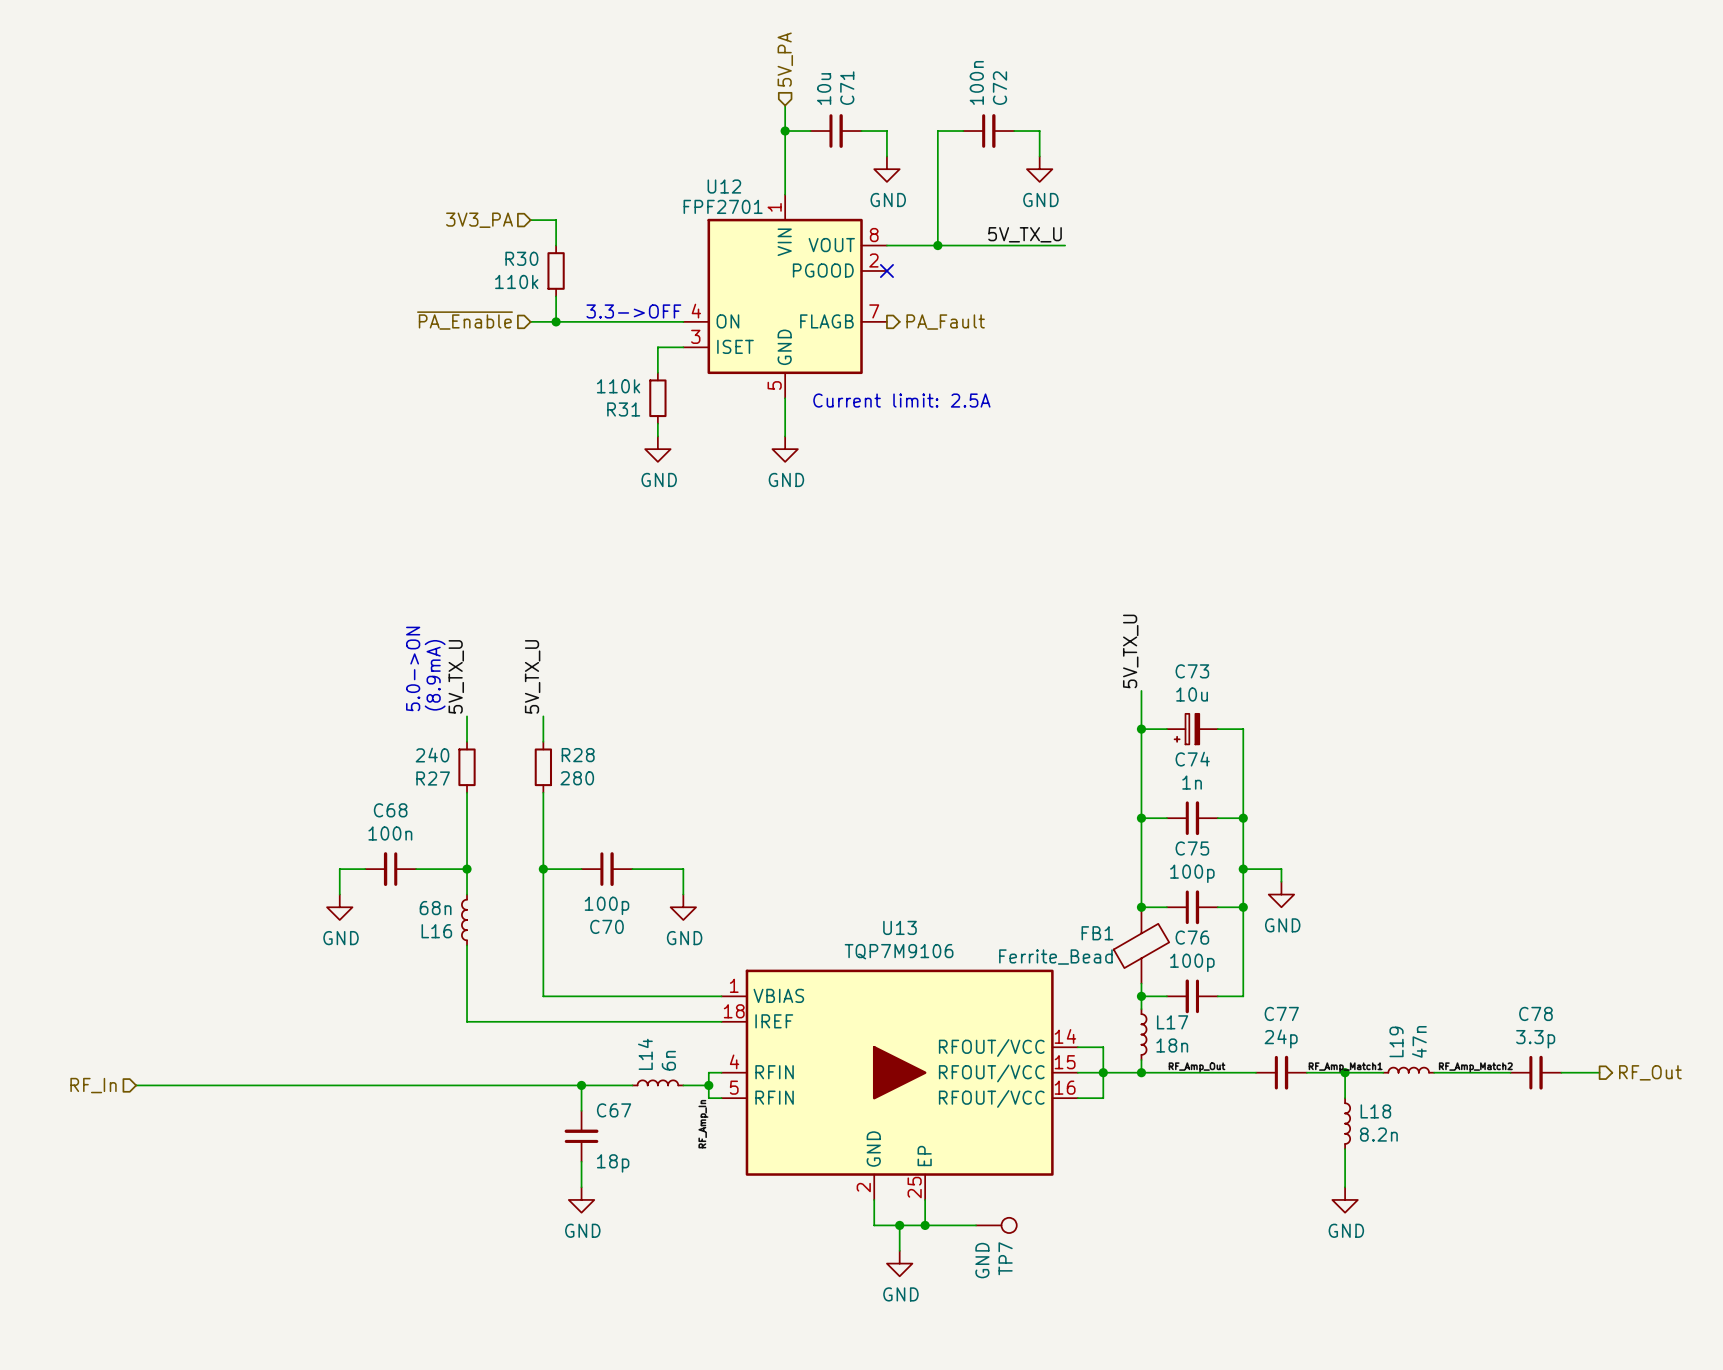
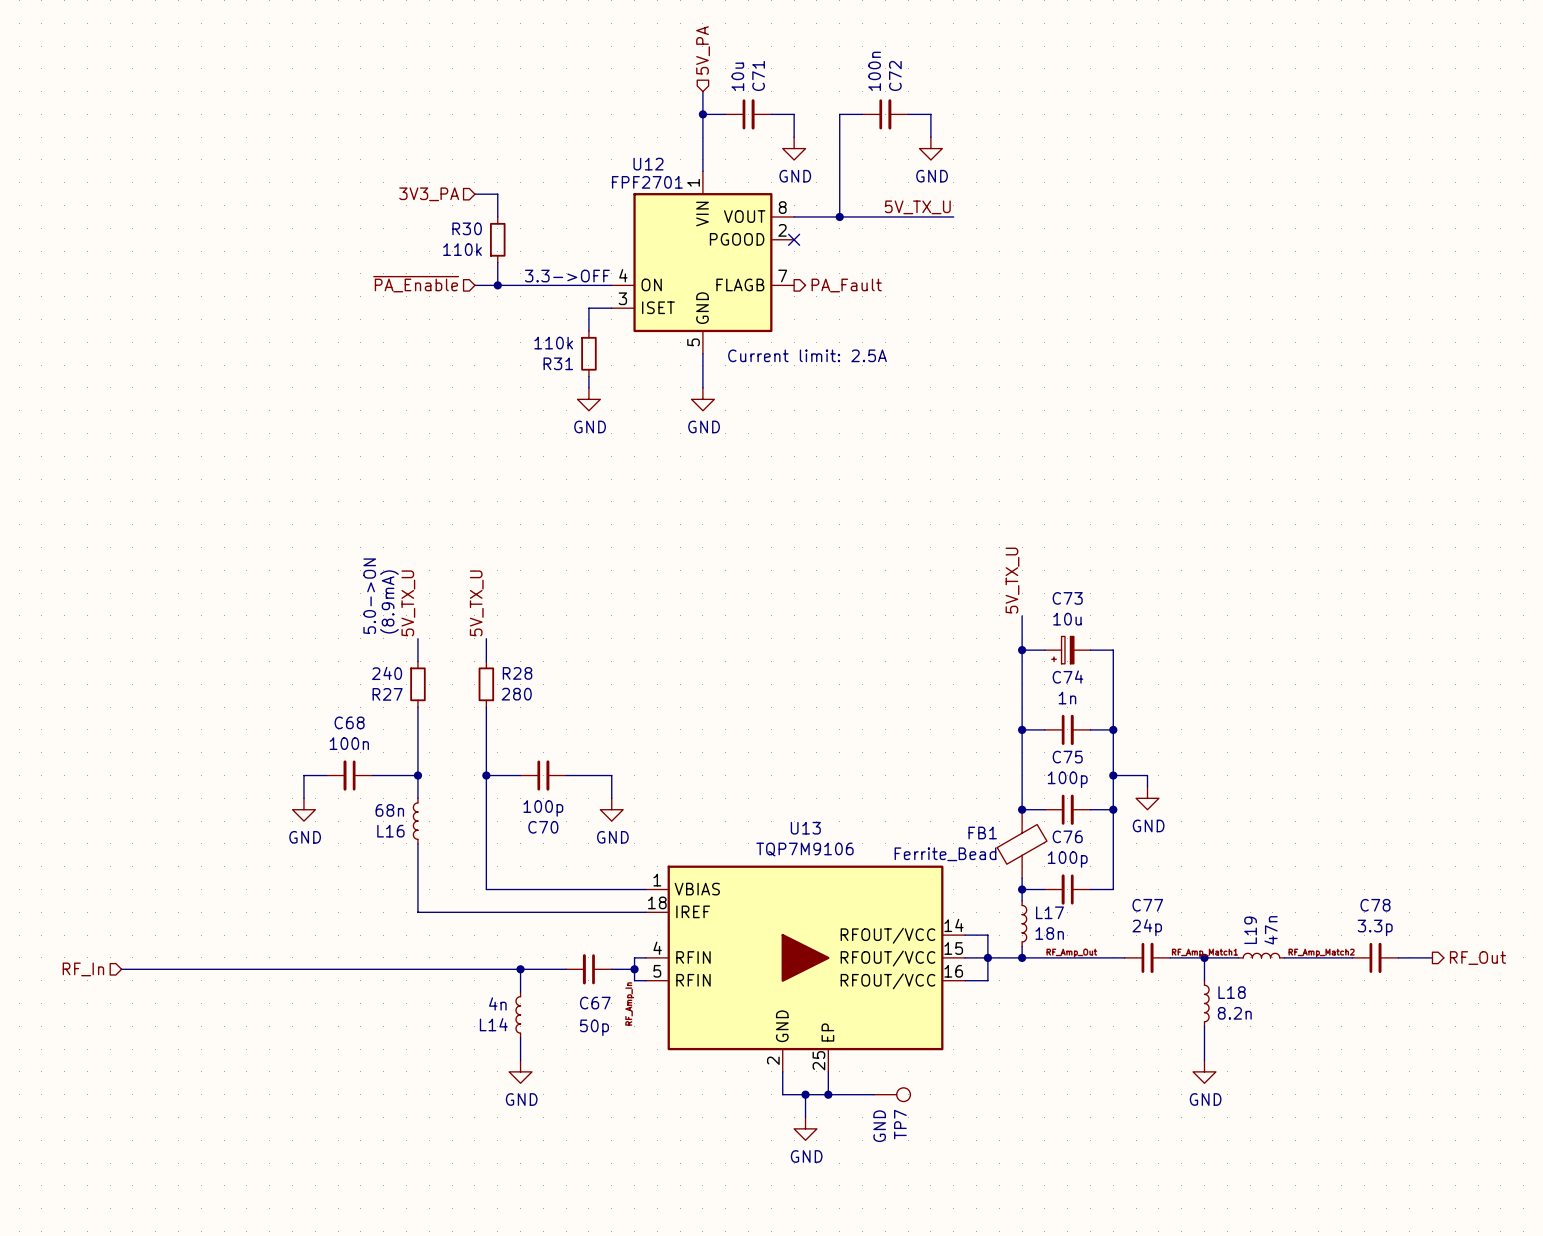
L14 value: 6n (668, 1060) -> 4n (497, 1003)
L14 rotation: 0° (657, 1082) -> 90° counterclockwise (518, 1014)
L14 position: (657, 1082) -> (518, 1014)
C67 name position: C67 (614, 1110) -> C67 (595, 1003)
C67 rotation: 0° (581, 1136) -> 90° counterclockwise (588, 969)
C67 position: (581, 1136) -> (588, 969)
C67 value: 18p (613, 1163) -> 50p (594, 1027)

